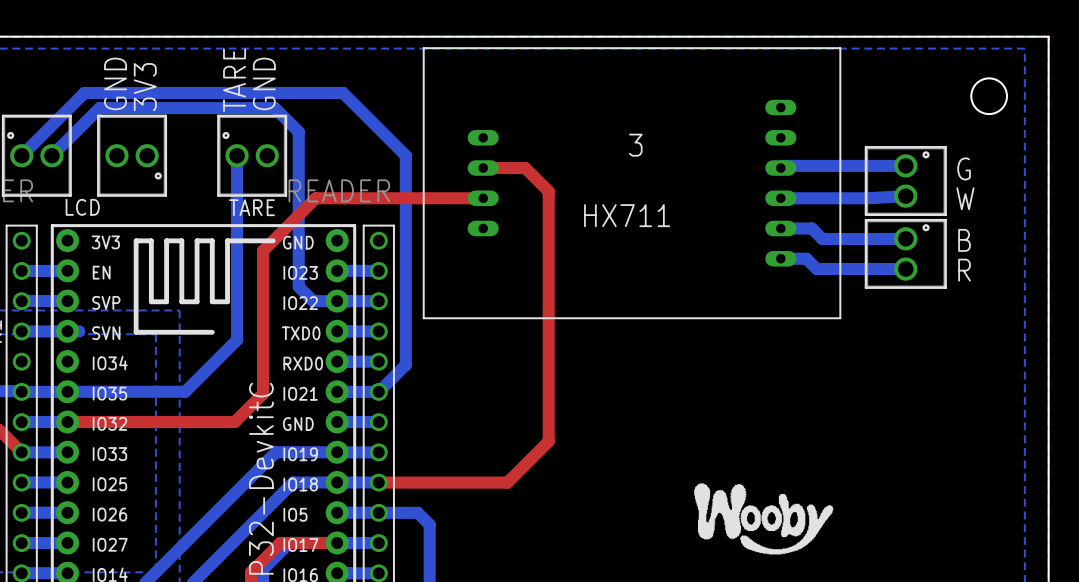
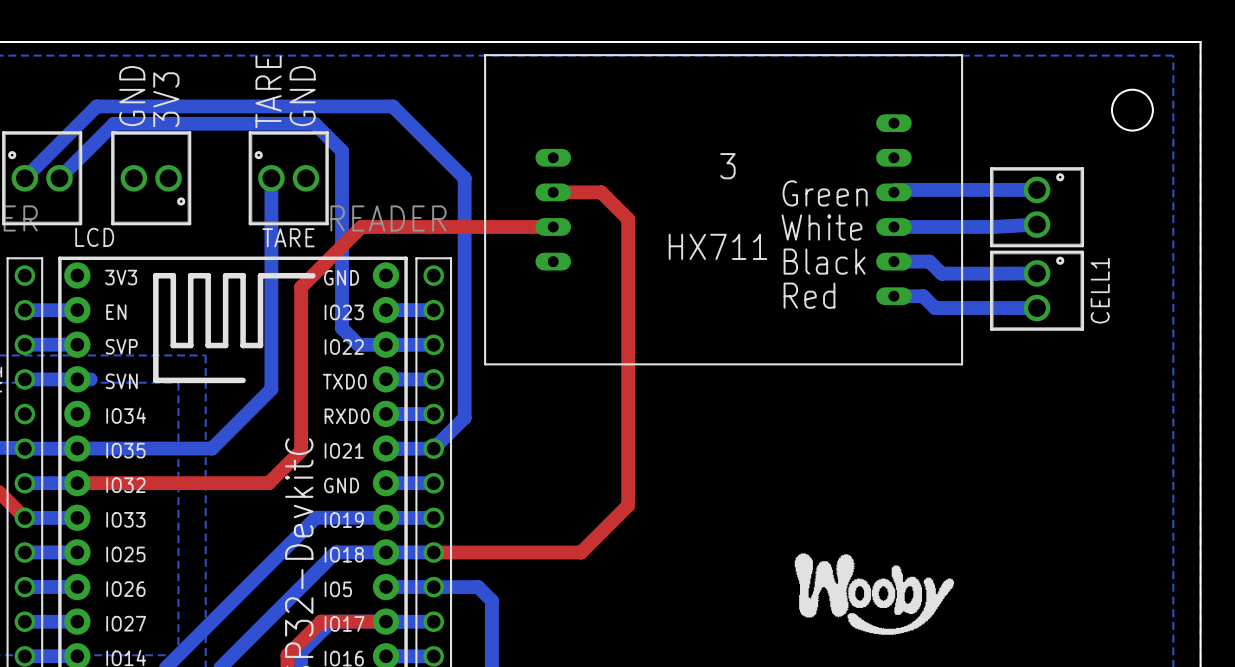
text: none -> Green (825, 193)
text: G (964, 168) -> none
text: none -> White (821, 227)
text: W (965, 198) -> none
text: none -> Black (824, 261)
text: B (964, 240) -> none
CELL1 name: none -> CELL1 (1100, 290)
text: none -> Red (809, 295)
text: R (964, 270) -> none

